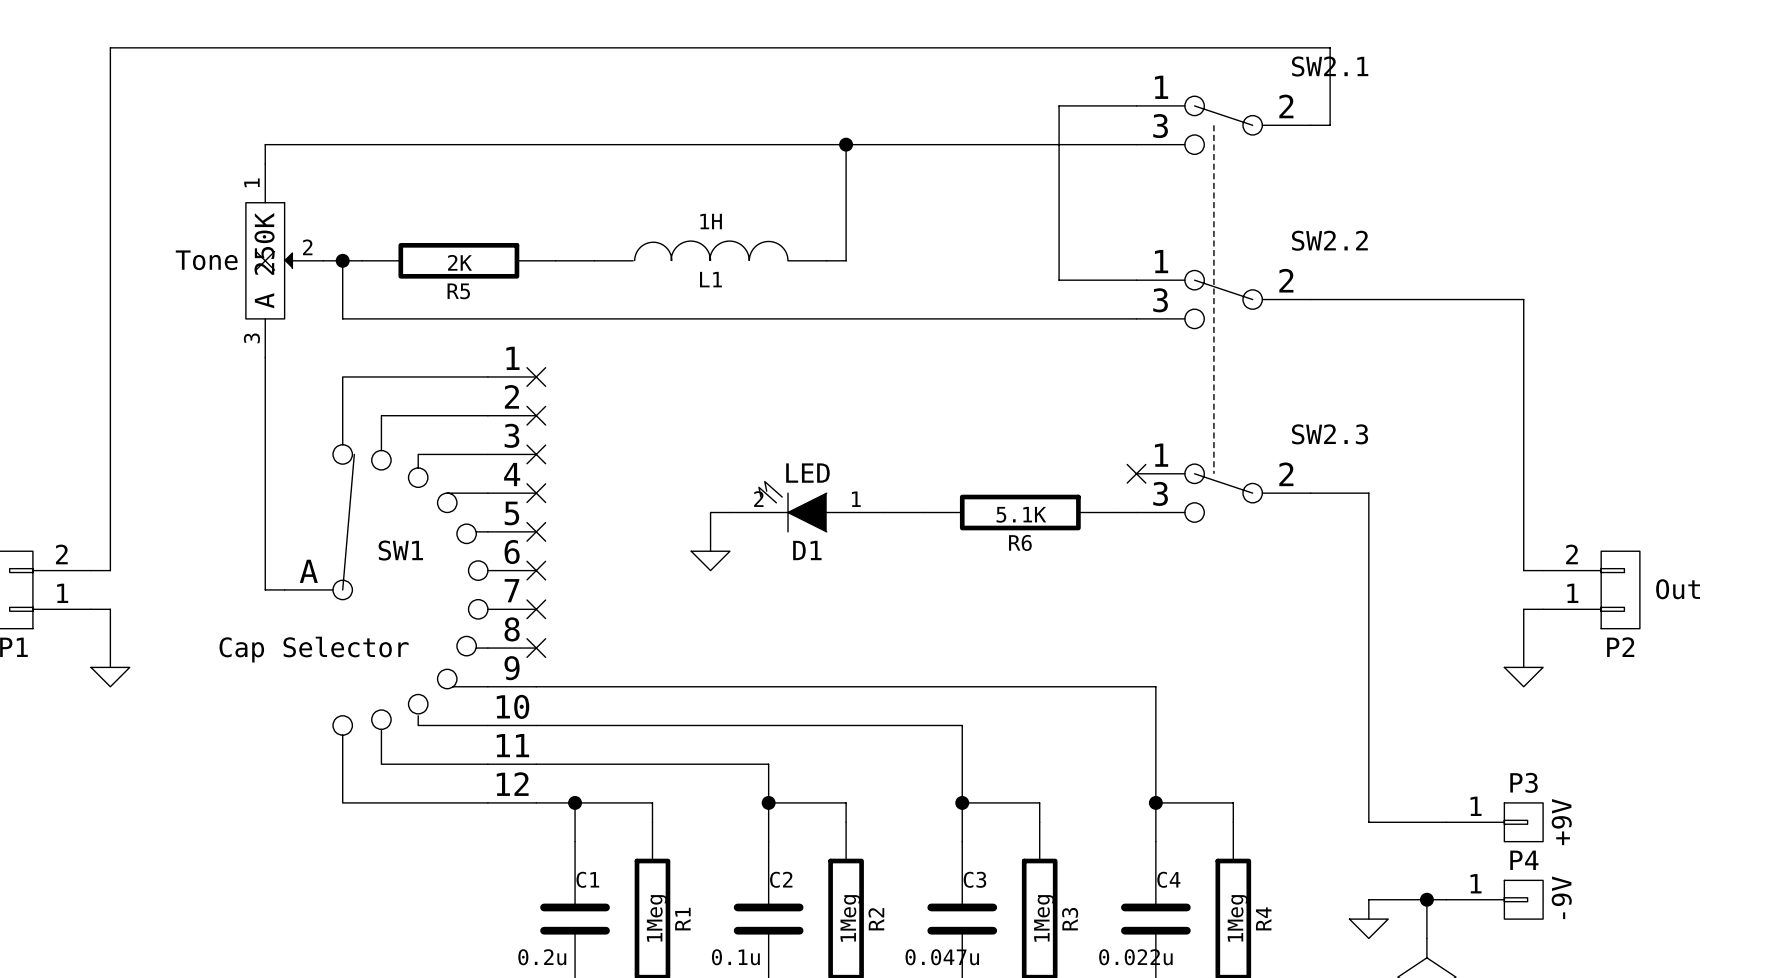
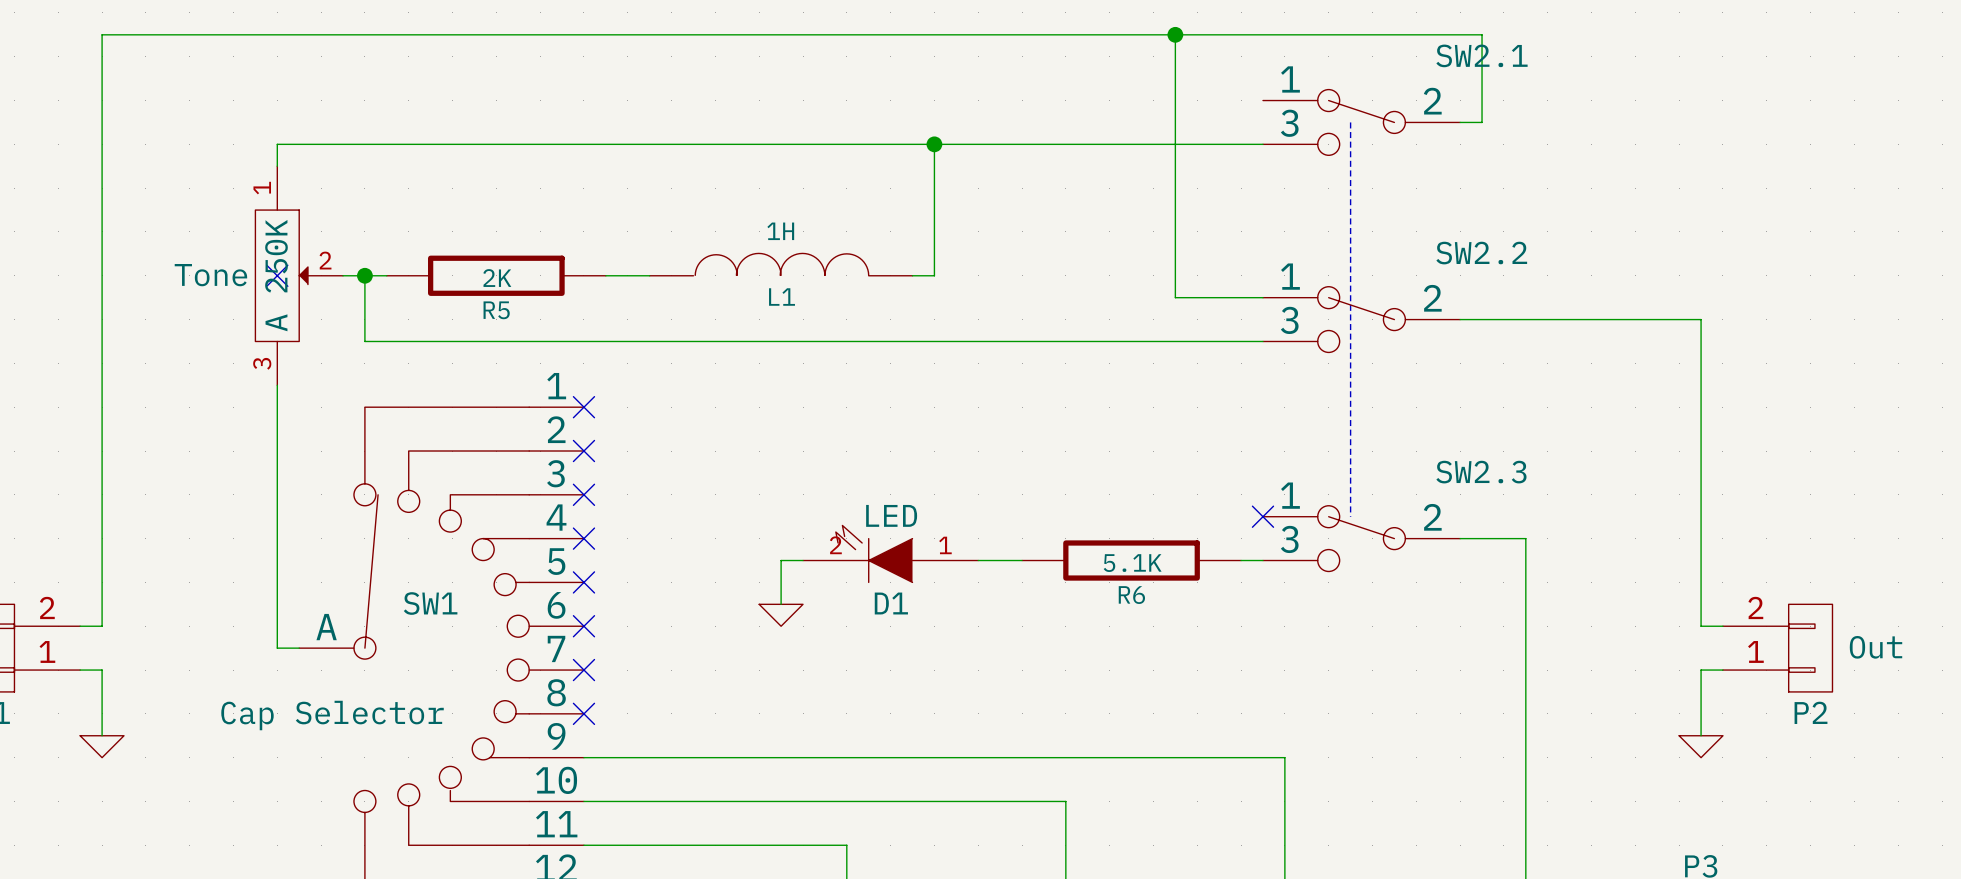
junction: none -> (1175, 34)
wire: (1059, 105) (1136, 105) -> (1175, 100) (1175, 34)

